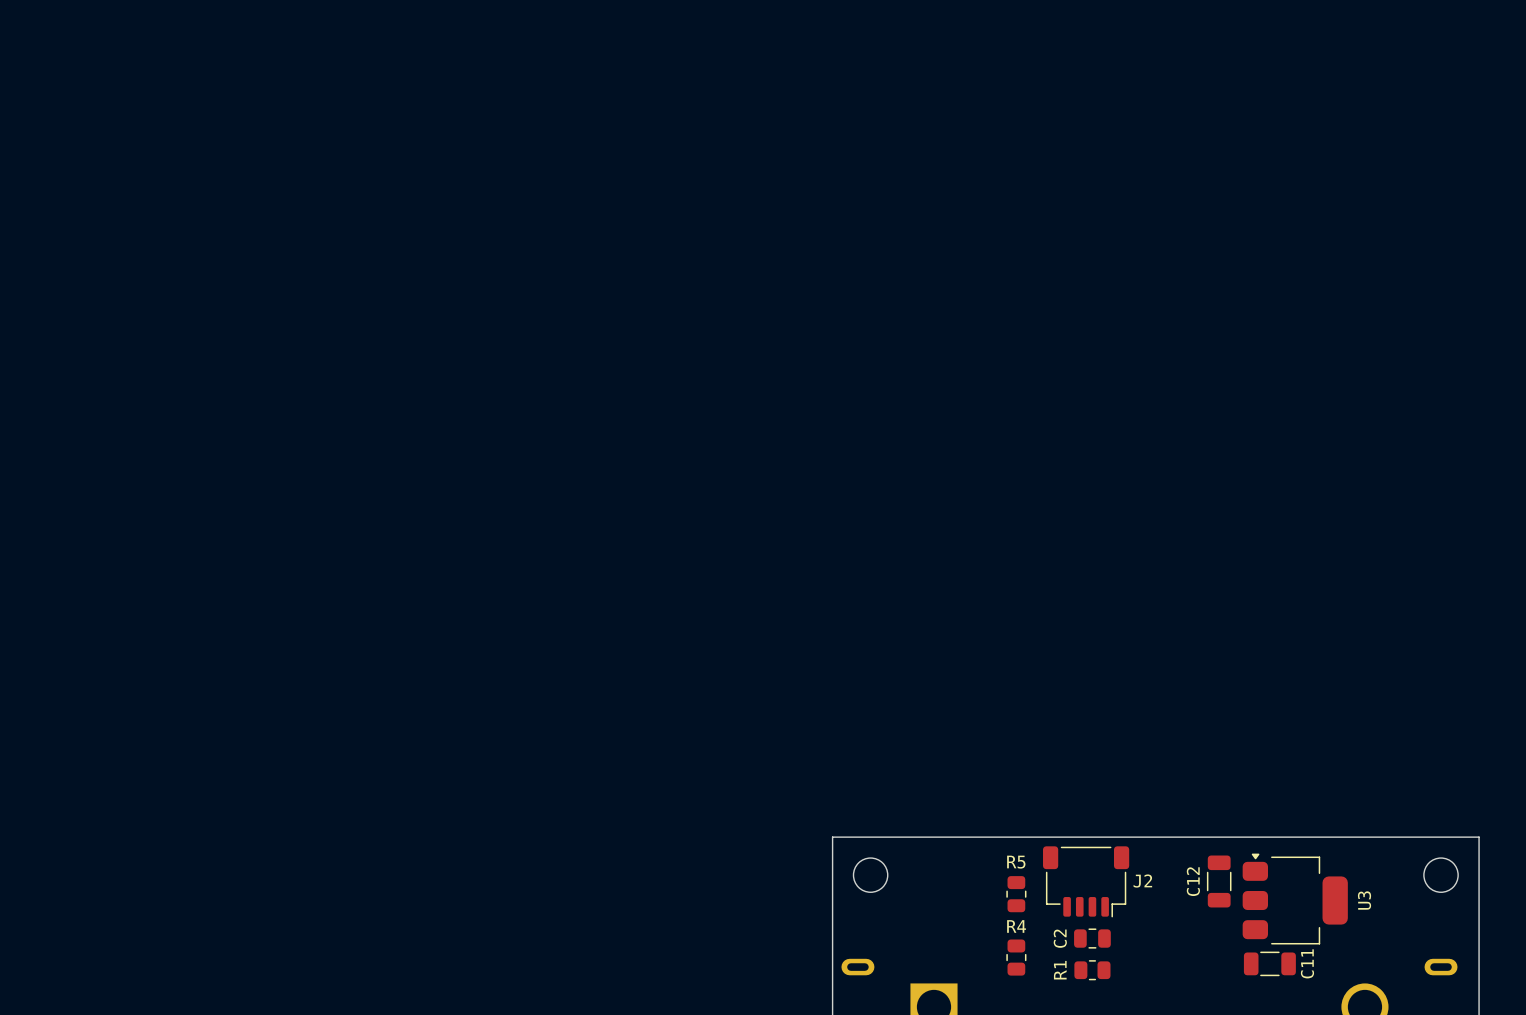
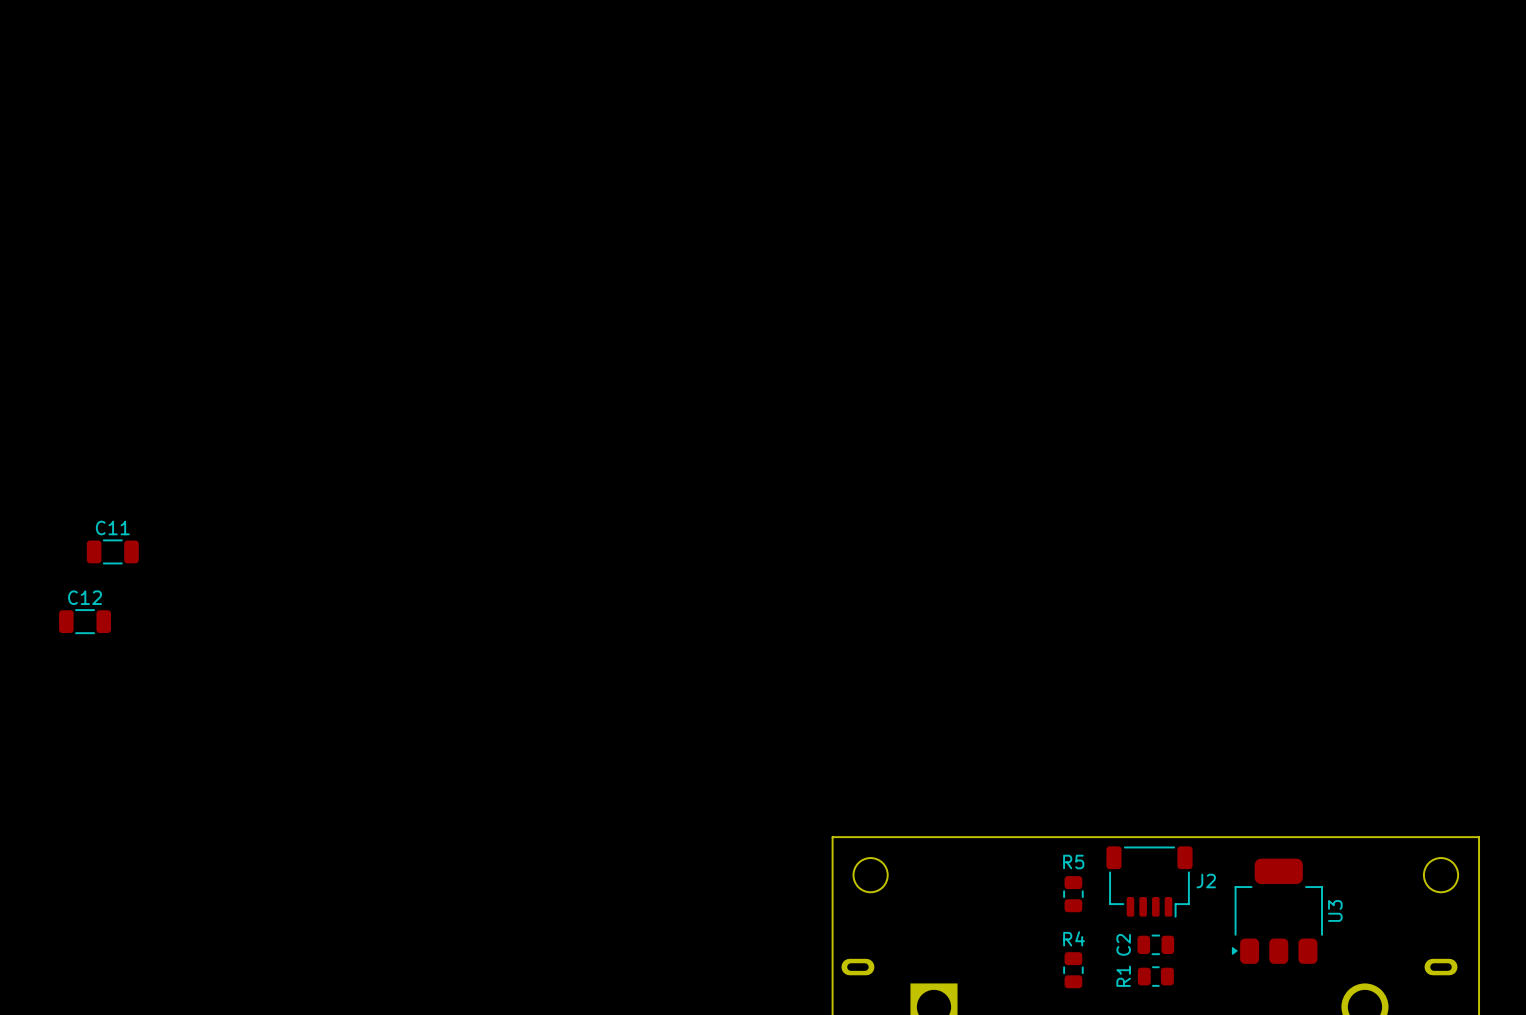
J2 position: (1086, 881) -> (1149, 881)
C12 rotation: 0° (1219, 881) -> 90° clockwise (85, 621)
C12 position: (1219, 881) -> (85, 621)
R5 position: (1016, 894) -> (1073, 894)
U3 rotation: 0° (1295, 899) -> 90° counterclockwise (1277, 911)
C2 position: (1092, 938) -> (1155, 944)
R4 position: (1016, 957) -> (1073, 970)
C11 position: (1269, 963) -> (112, 551)
C11 name rotation: 0° (1307, 963) -> 90° clockwise (112, 528)
C11 name position: C11 (1307, 963) -> C11 (112, 528)
R1 position: (1092, 970) -> (1155, 976)

